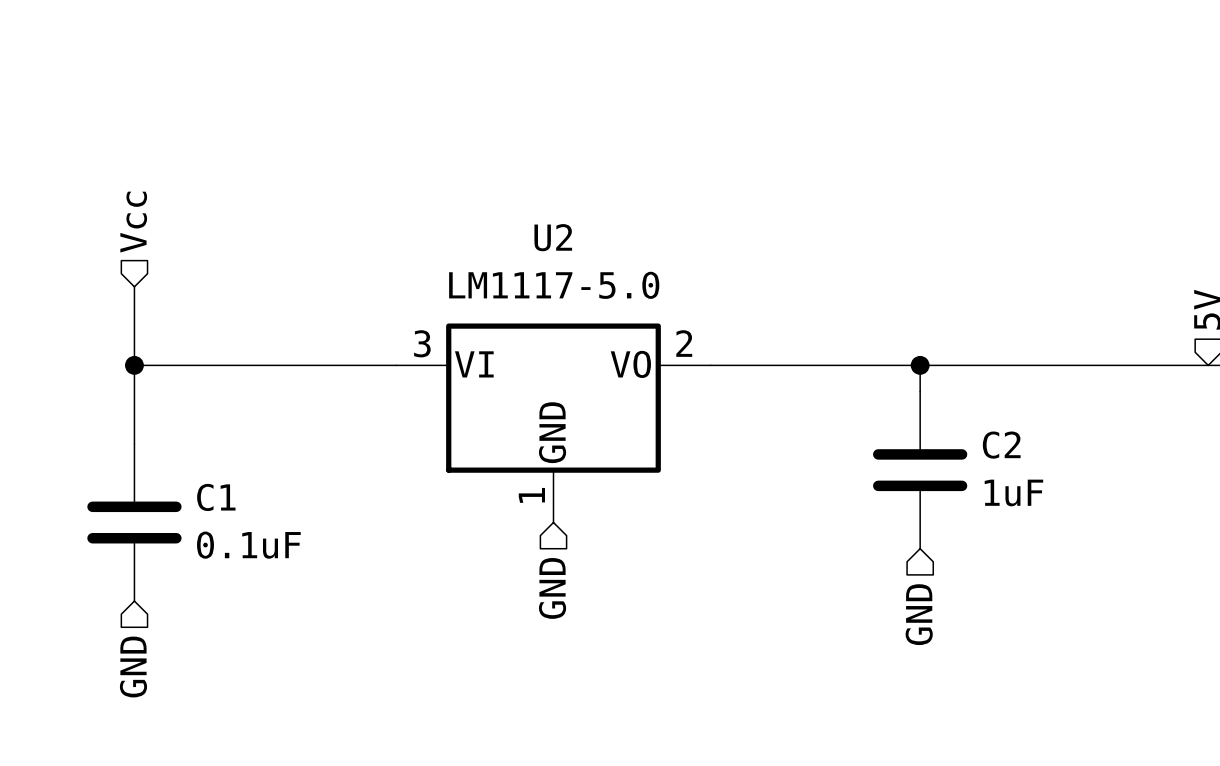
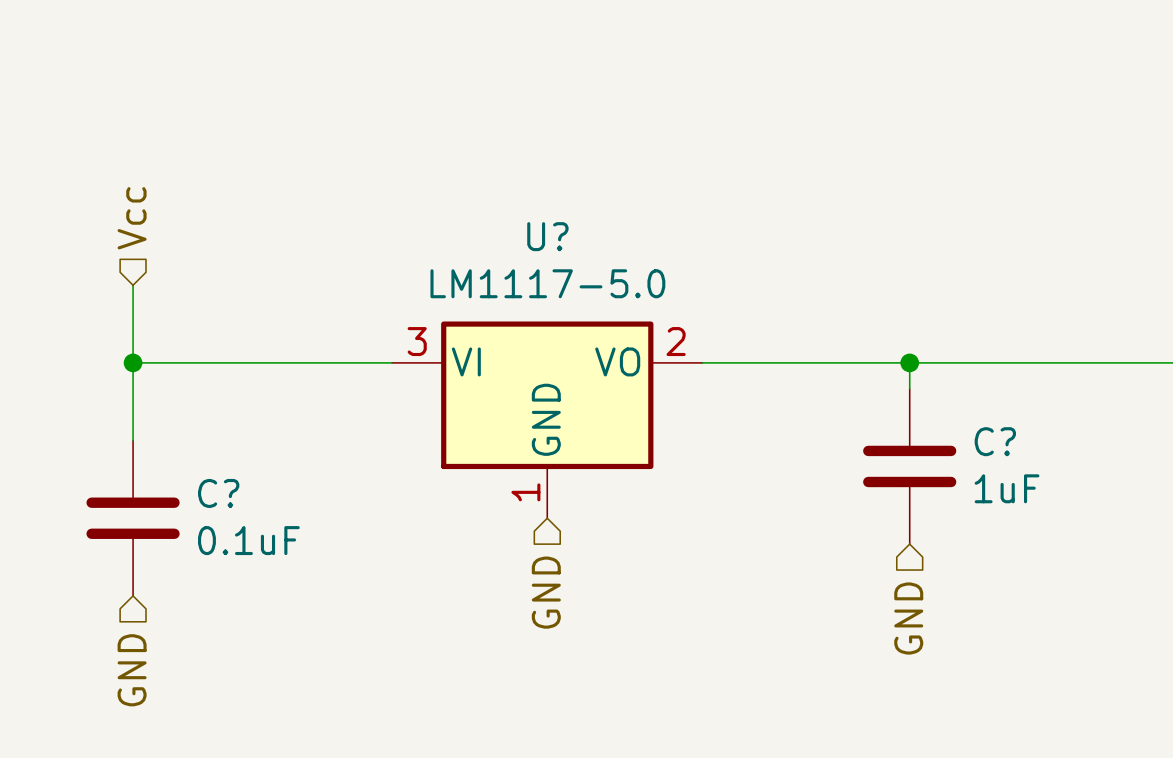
U2 name: U2 (553, 237) -> U? (547, 236)
C2 name: C2 (1001, 445) -> C? (995, 441)
C1 name: C1 (216, 497) -> C? (218, 493)

